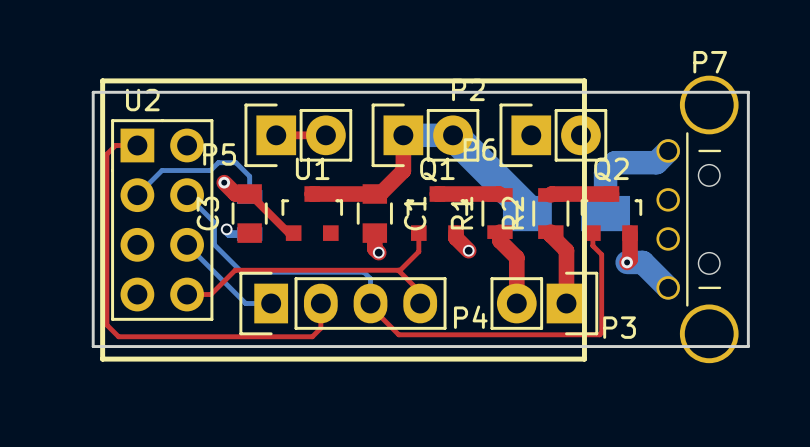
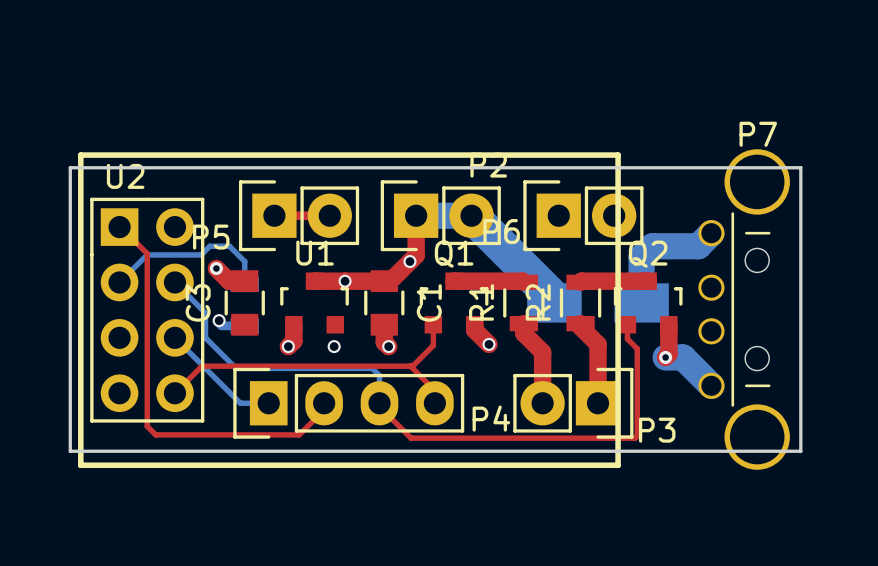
top track: (137, 145) (115, 145) (106, 154) (106, 325) (118, 336) (312, 336) (320, 328) (320, 309) -> (119, 230) (120, 227) (147, 253) (147, 426) (155, 434) (299, 434) (324, 410)
via: none -> (409, 261)
top track: (249, 193) (288, 233) (292, 233) -> none
via: none -> (345, 281)
top track: none -> (293, 324) (293, 341) (288, 346)
via: none -> (288, 346)
via: none -> (334, 346)
top track: (235, 270) (210, 294) (187, 294) -> (228, 366) (202, 366) (174, 393)

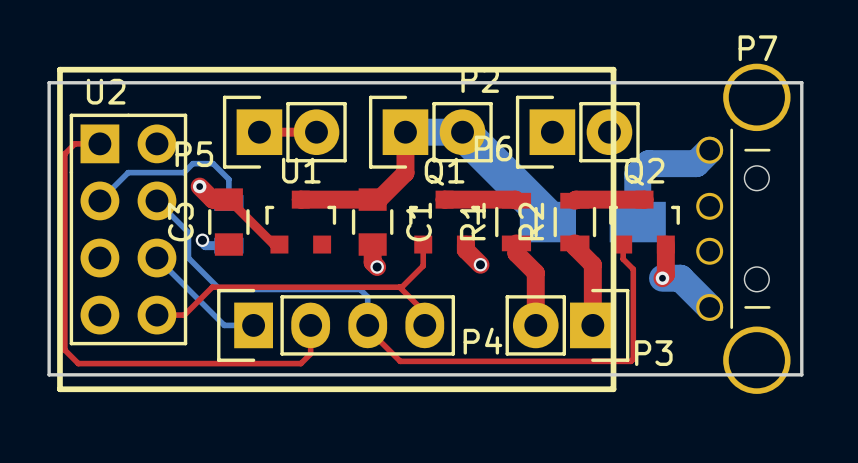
top track: (119, 230) (120, 227) (147, 253) (147, 426) (155, 434) (299, 434) (324, 410) -> (99, 143) (74, 143) (64, 153) (64, 350) (78, 363) (300, 363) (310, 353) (310, 332)
via: (409, 261) -> none
top track: none -> (228, 199) (273, 244) (278, 244)
via: (345, 281) -> none
top track: (293, 324) (293, 341) (288, 346) -> none
via: (288, 346) -> none
via: (334, 346) -> none
top track: (228, 366) (202, 366) (174, 393) -> (212, 287) (184, 315) (156, 315)

